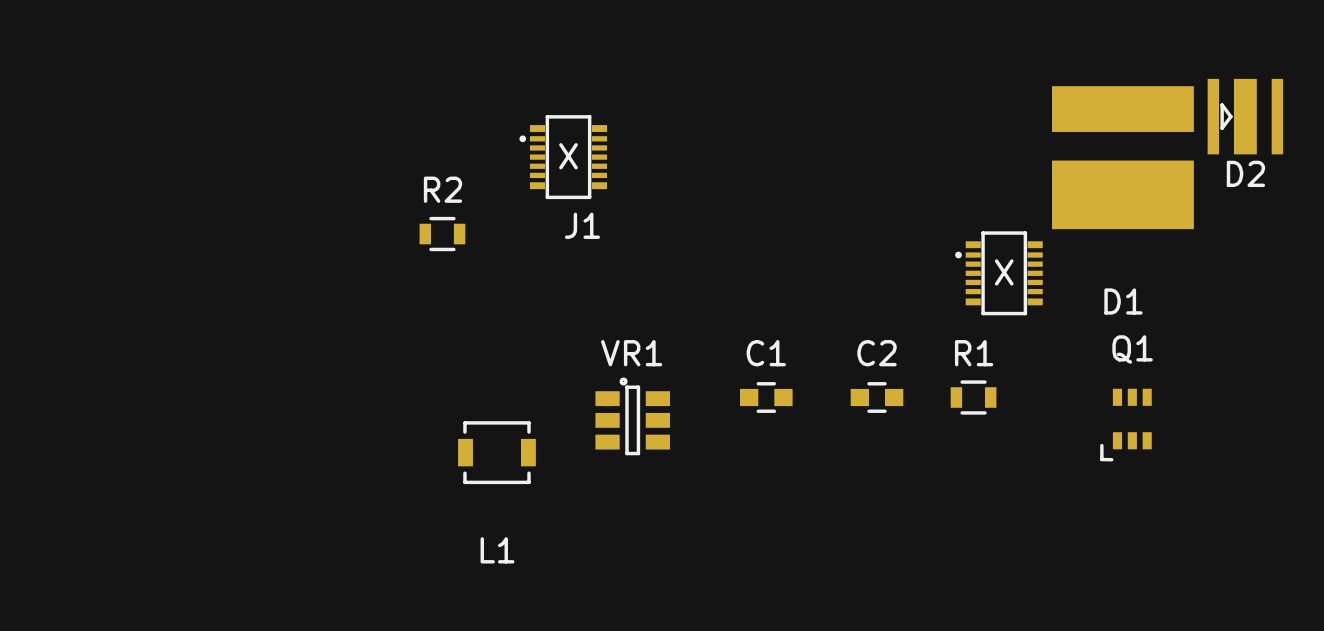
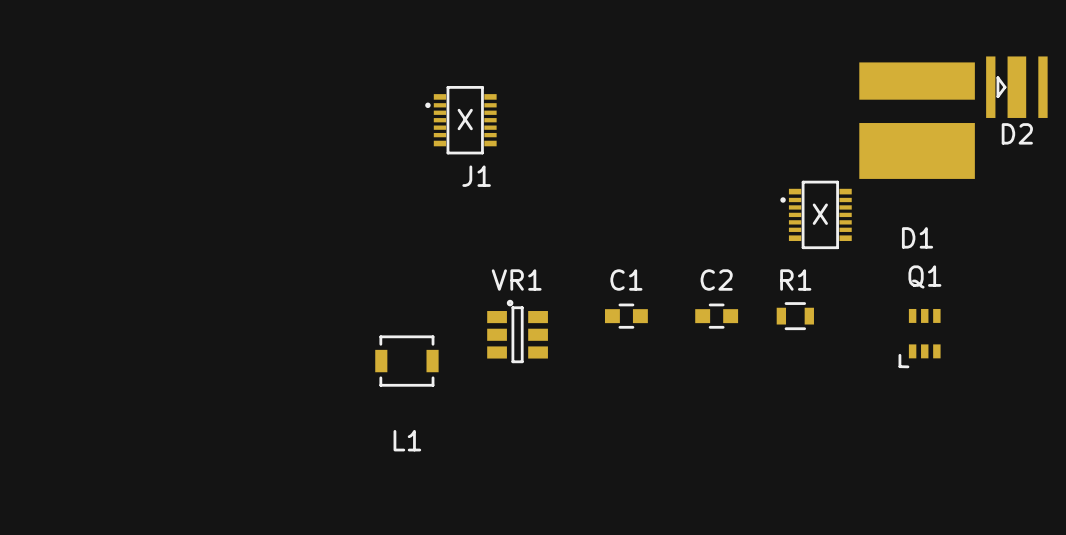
R2: (442, 234) -> none

